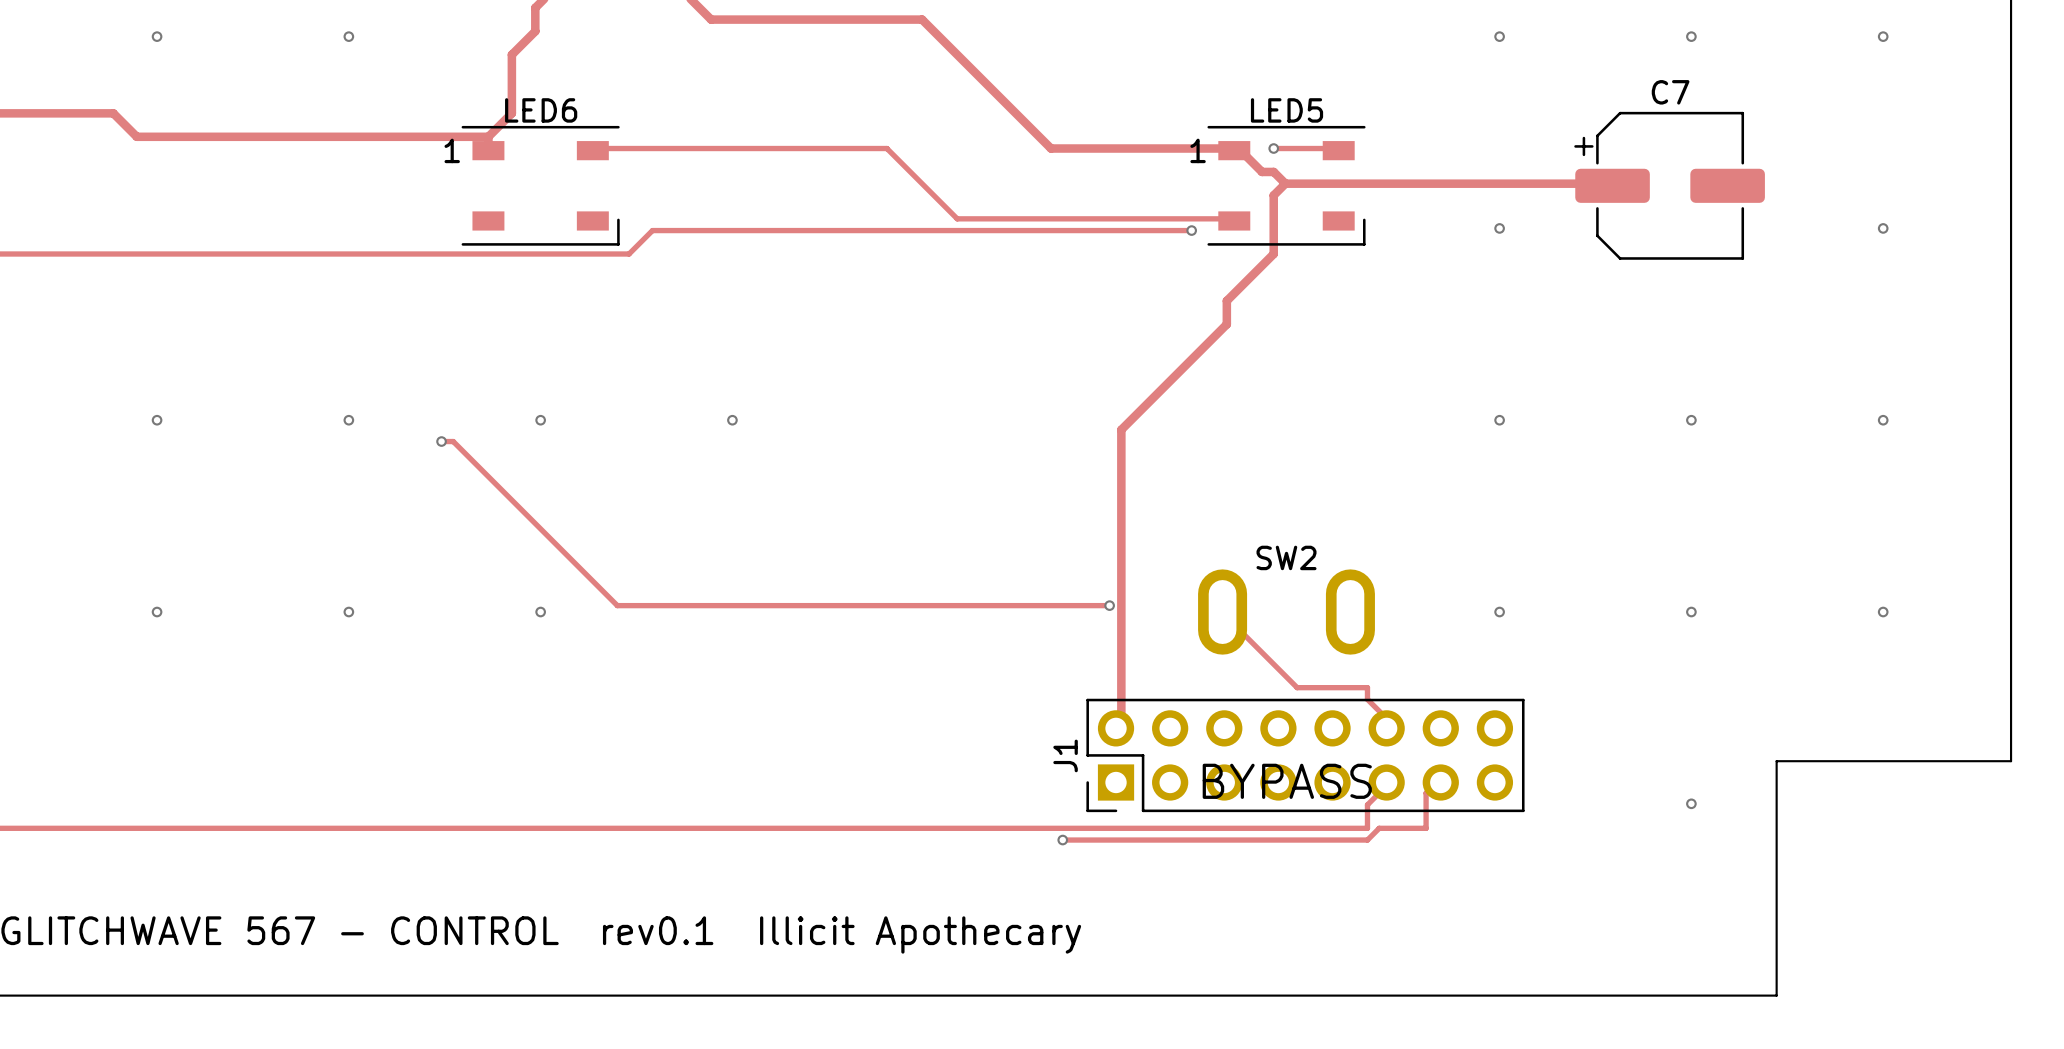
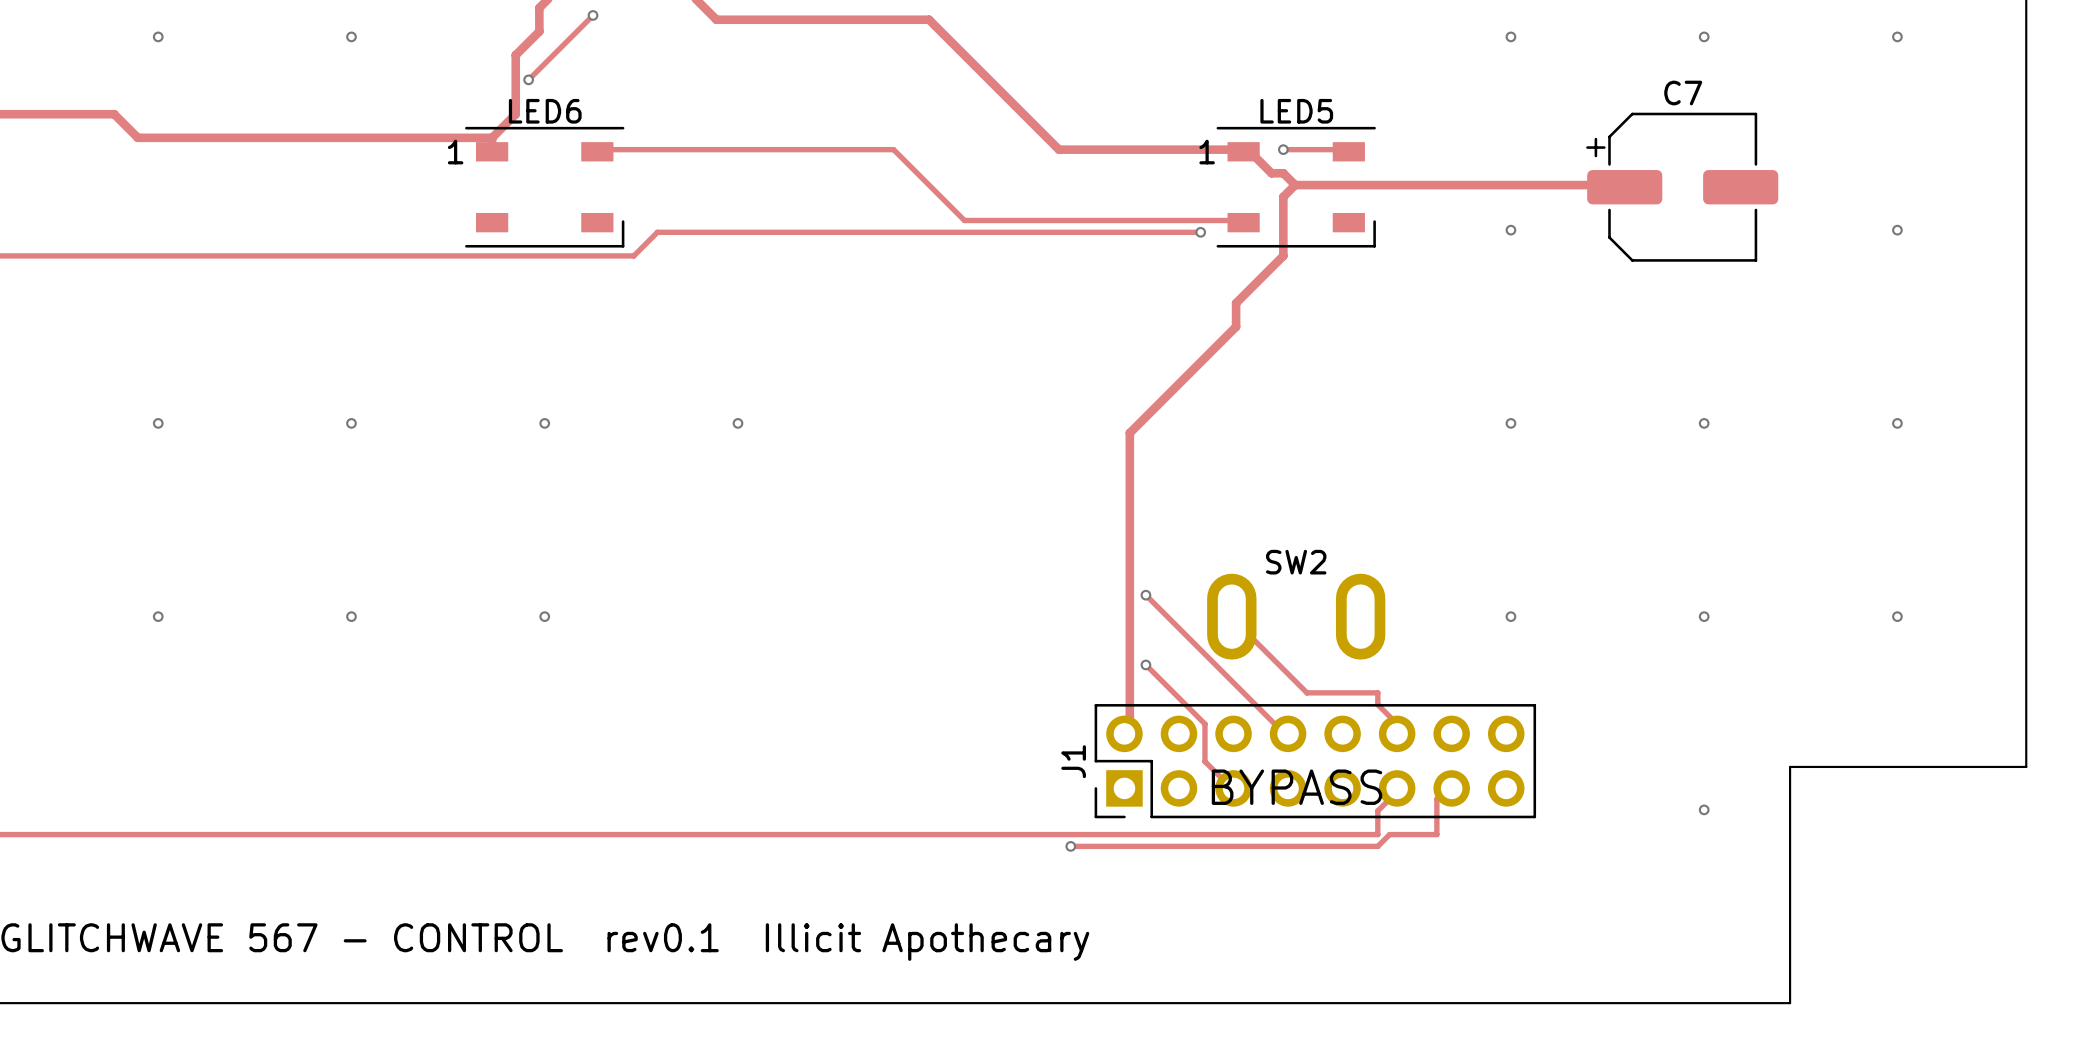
track: none -> (593, 15) (528, 79)
via: none -> (593, 15)
via: none -> (528, 79)
track: (441, 441) (453, 441) (617, 605) (1109, 605) -> none
via: (441, 441) -> none
track: none -> (1145, 595) (1285, 734) (1288, 733)
via: none -> (1145, 595)
via: (1109, 605) -> none
track: none -> (1145, 664) (1204, 724) (1204, 761) (1233, 788)
via: none -> (1145, 664)

